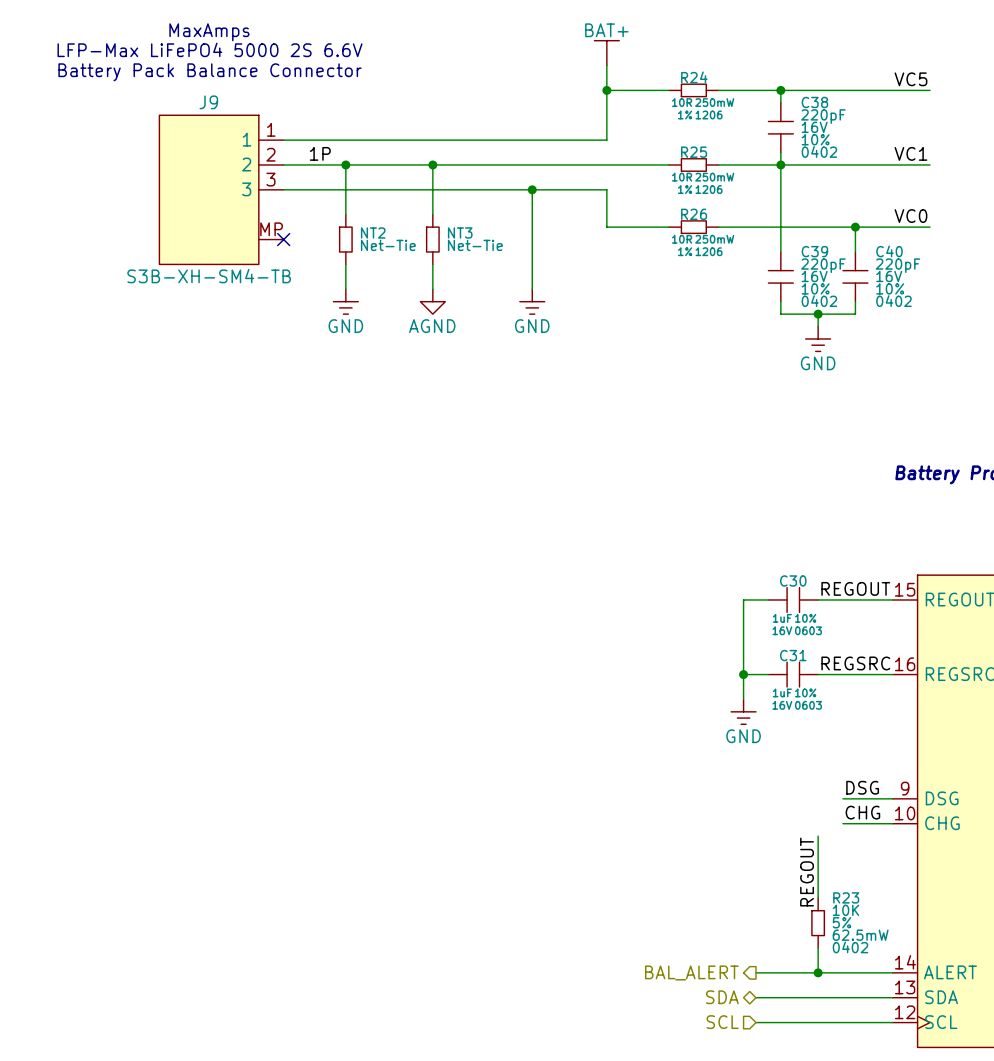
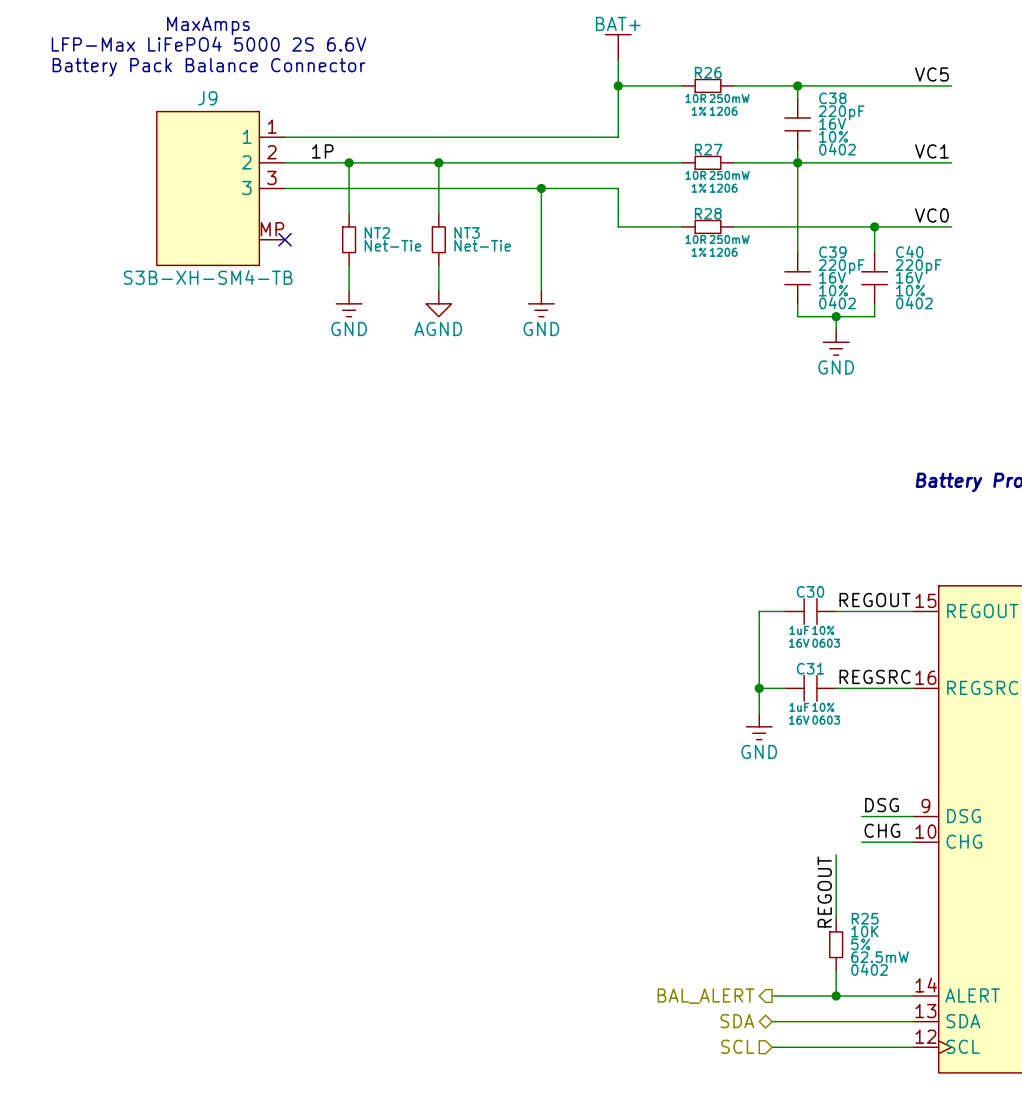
R24 name: R24 (694, 77) -> R26 (708, 72)
R25 name: R25 (694, 152) -> R27 (708, 149)
R26 name: R26 (694, 214) -> R28 (708, 213)
R23 name: R23 (846, 897) -> R25 (865, 918)

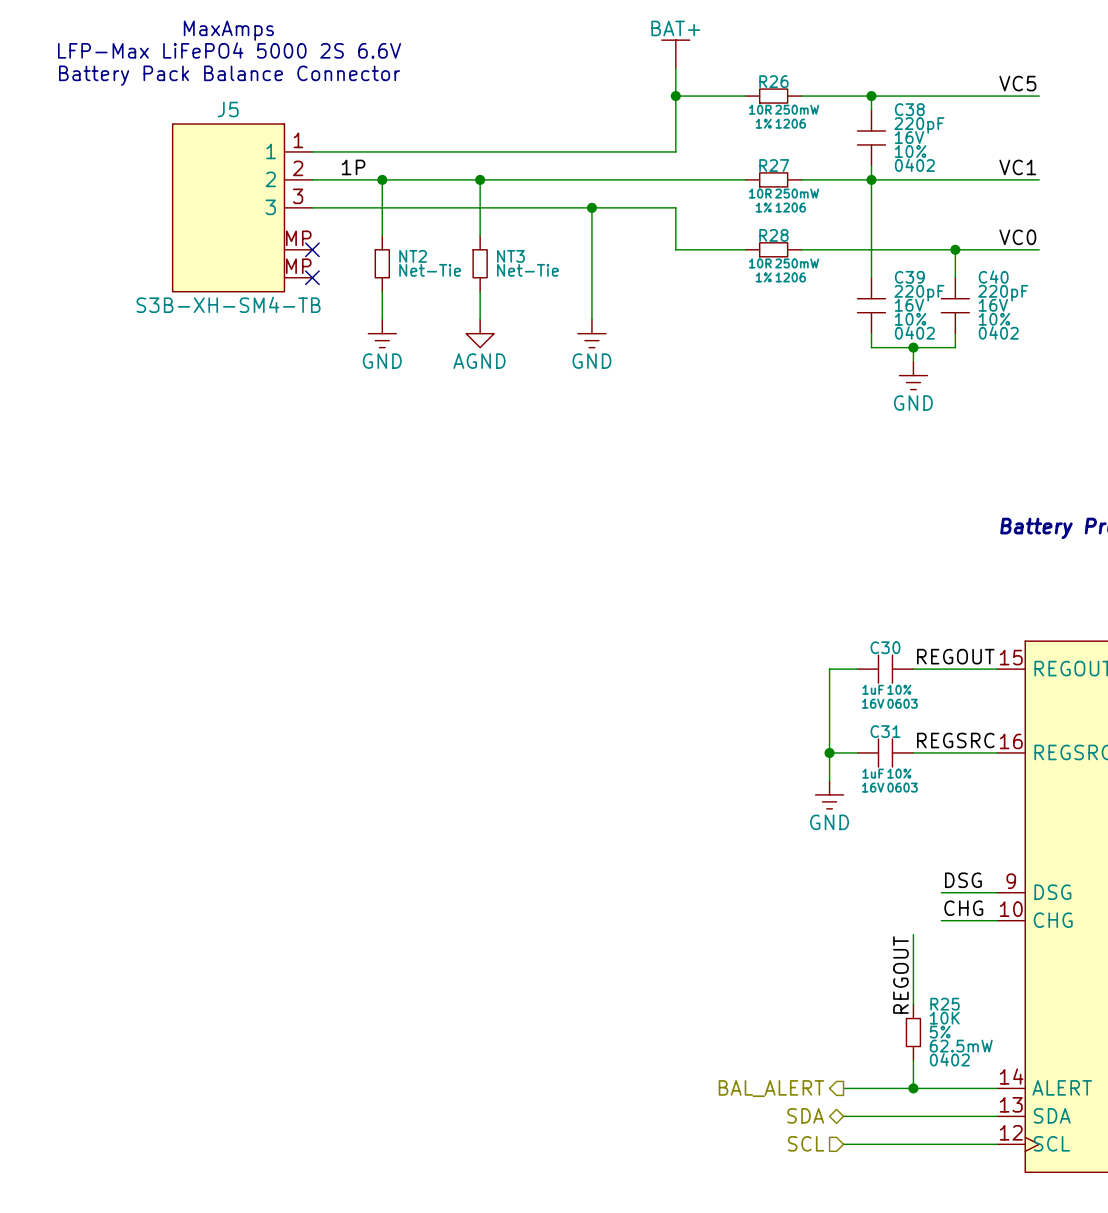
J9: S3B-XH-SM4-TB (220, 188) -> none
J5: none -> S3B-XH-SM4-TB (242, 207)
no-connect mark: none -> (312, 249)
no-connect mark: (285, 239) -> none
no-connect mark: none -> (312, 277)

